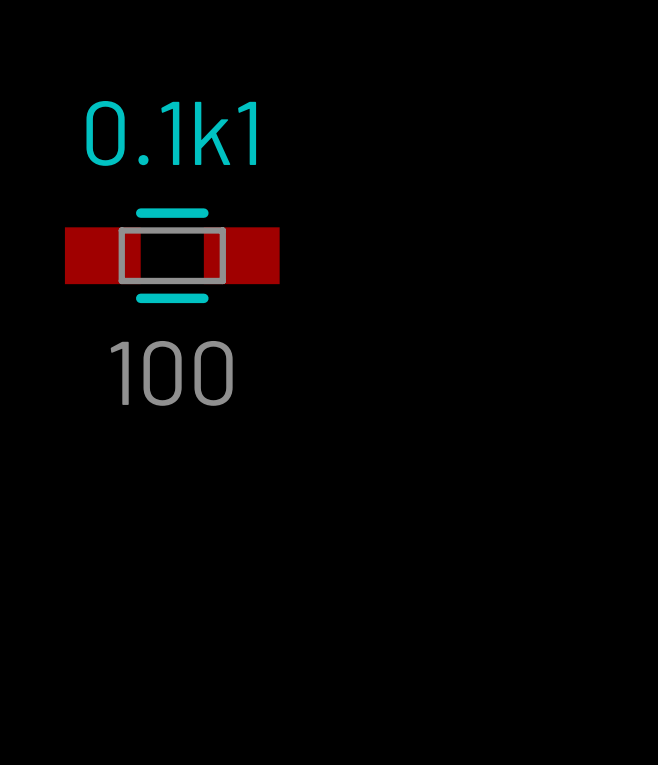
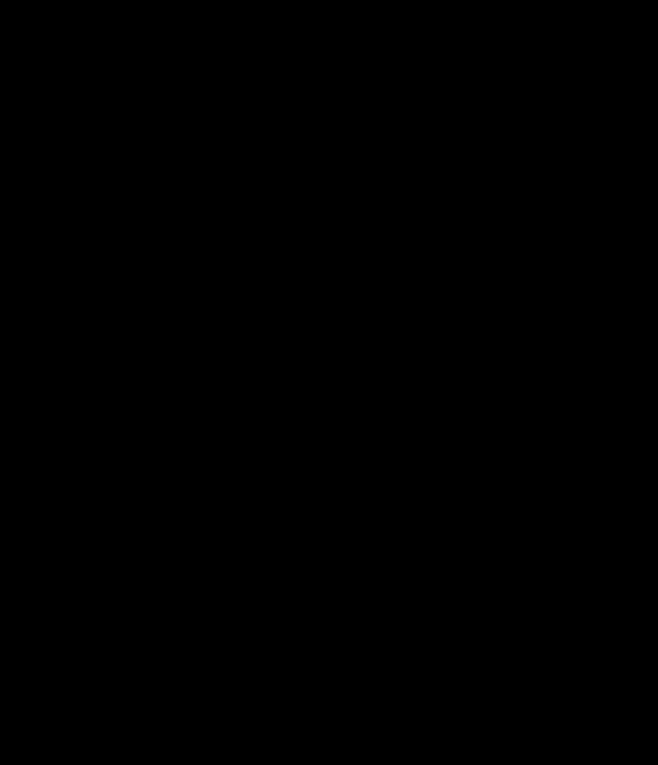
0.1k1: 100 (172, 255) -> none

